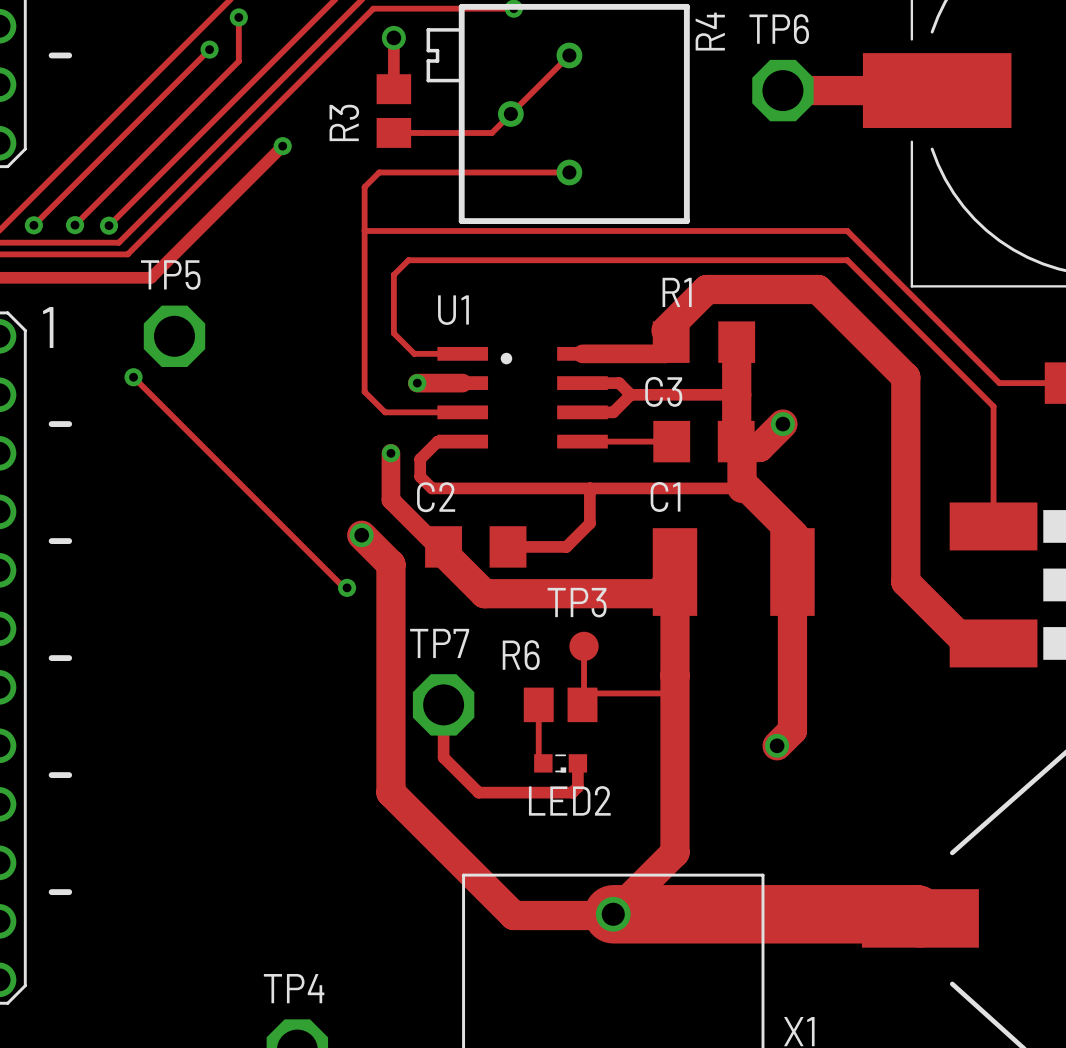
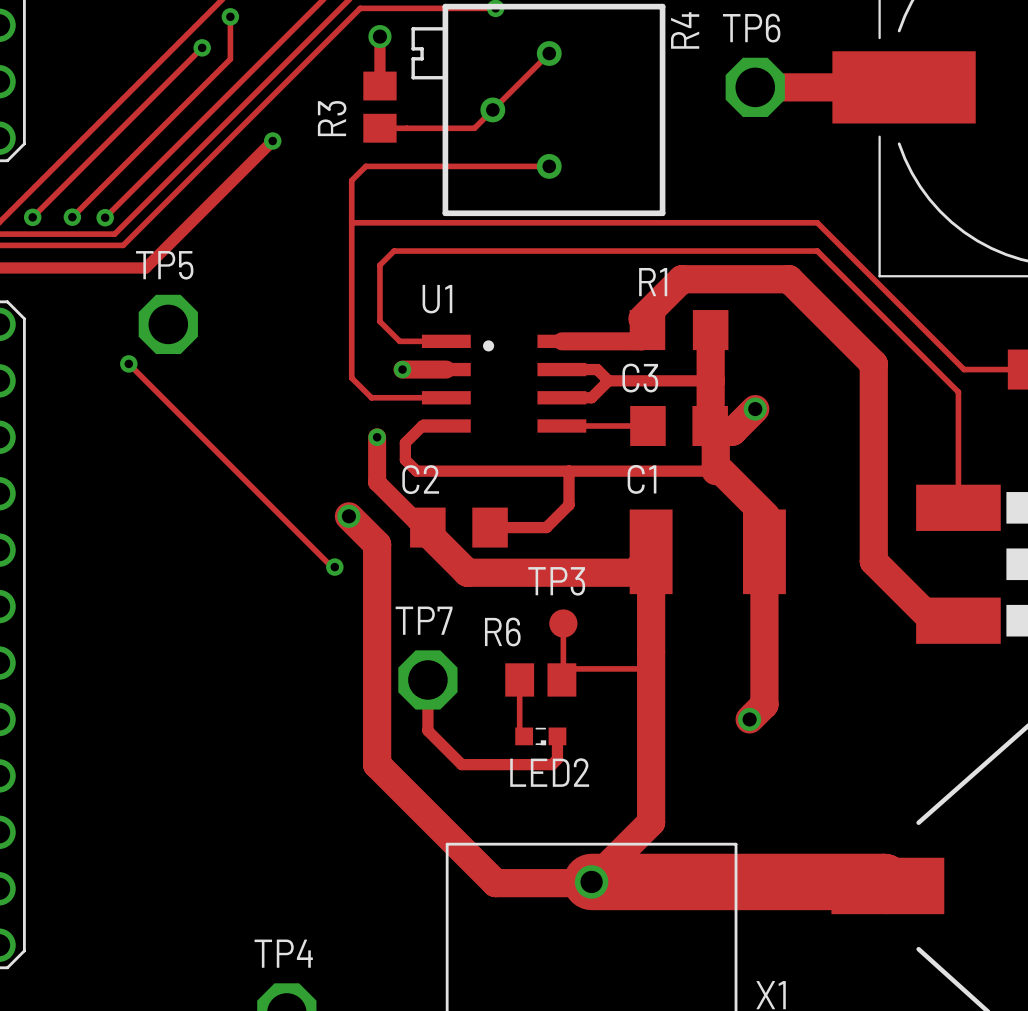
line: (51, 55) (69, 55) -> none
text: 1 (48, 327) -> none
line: (51, 424) (69, 424) -> none
line: (51, 541) (69, 541) -> none
line: (51, 658) (69, 658) -> none
line: (51, 775) (69, 775) -> none
line: (51, 892) (69, 892) -> none

